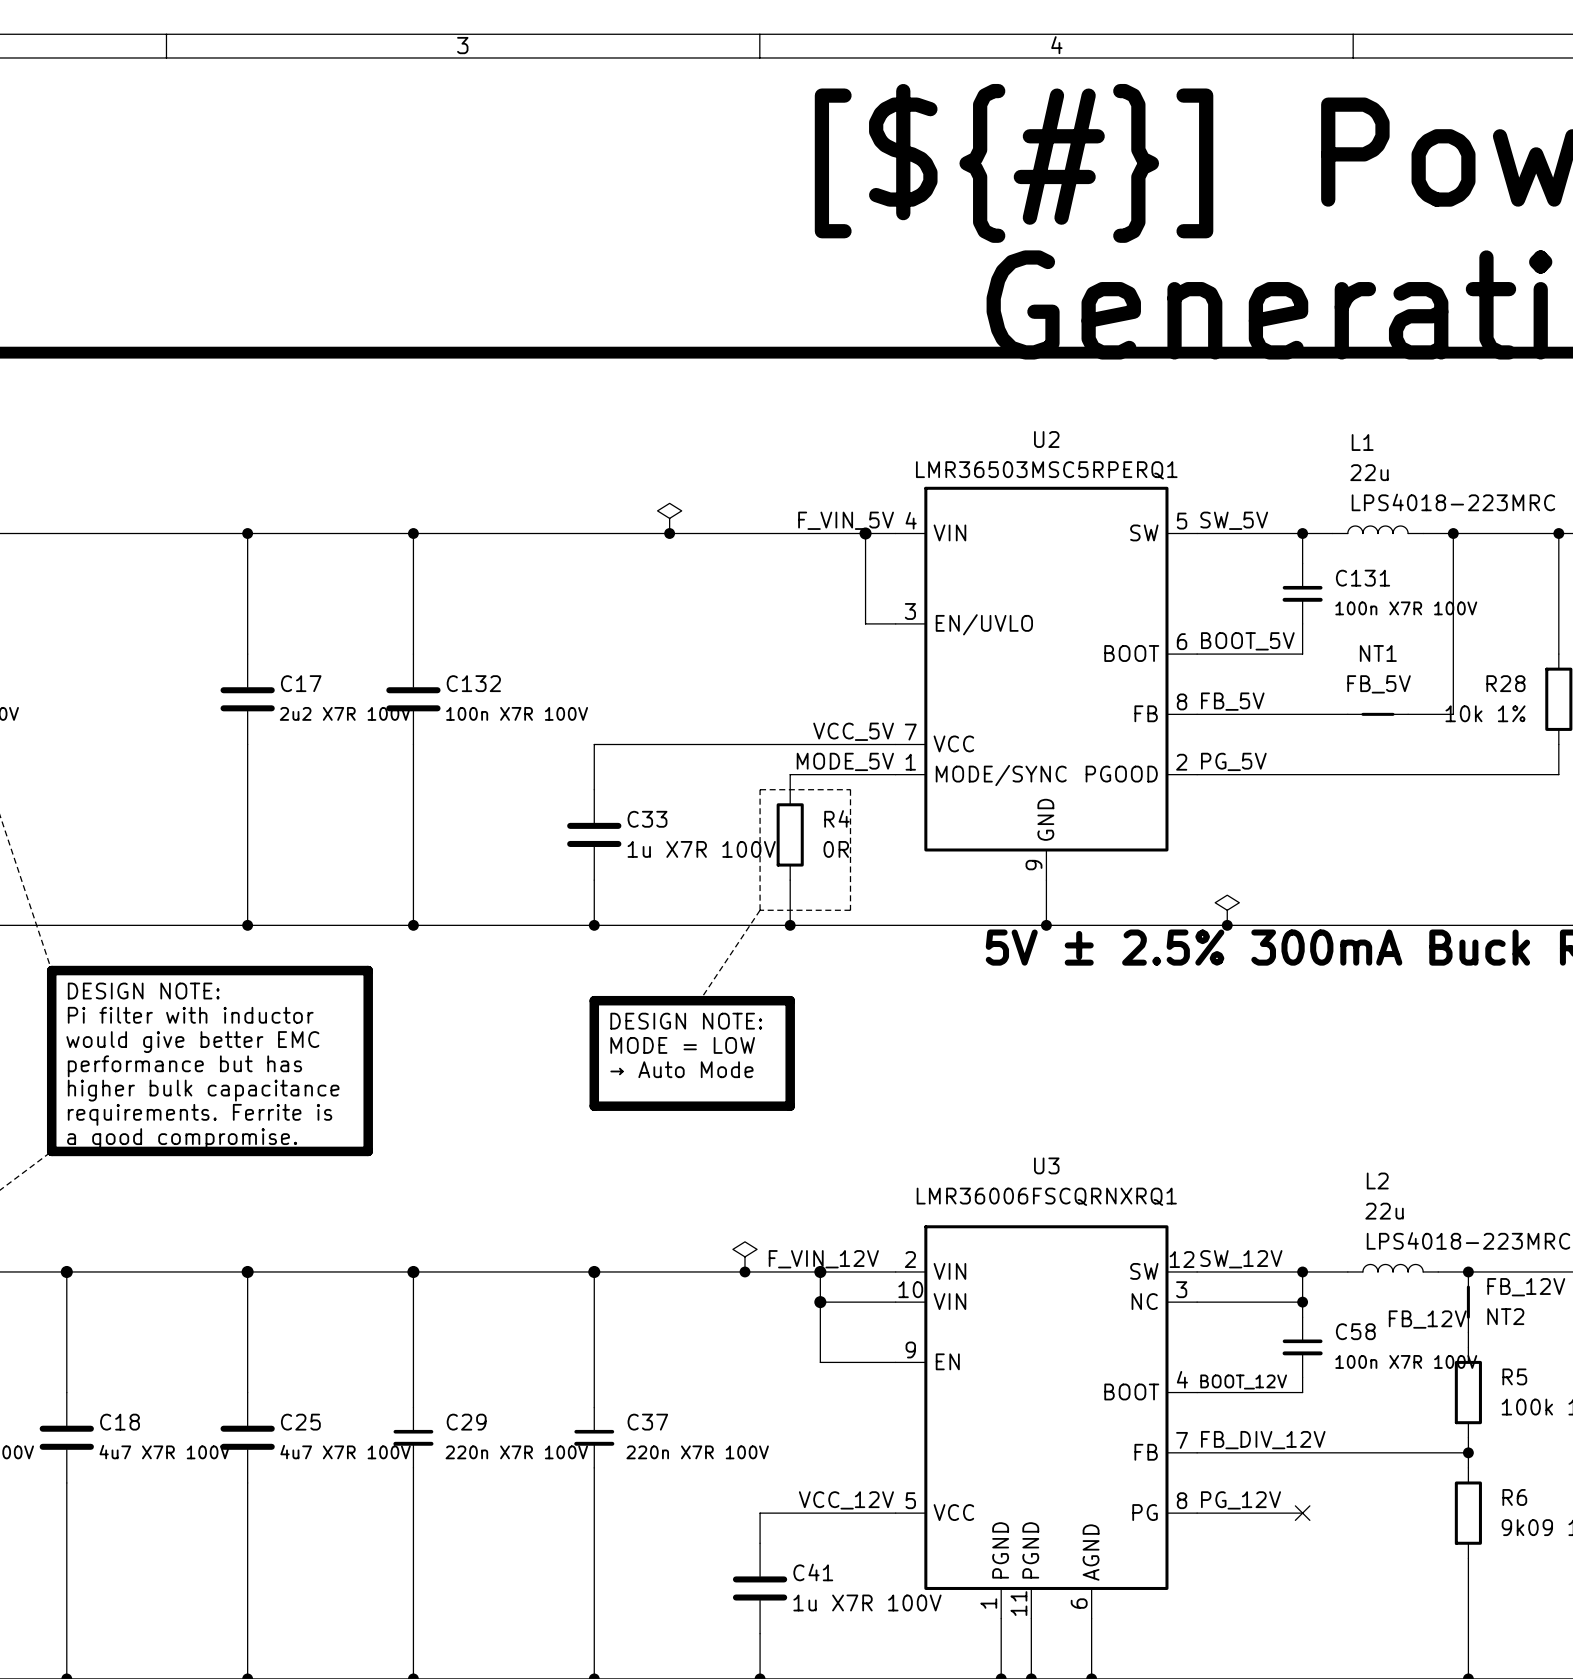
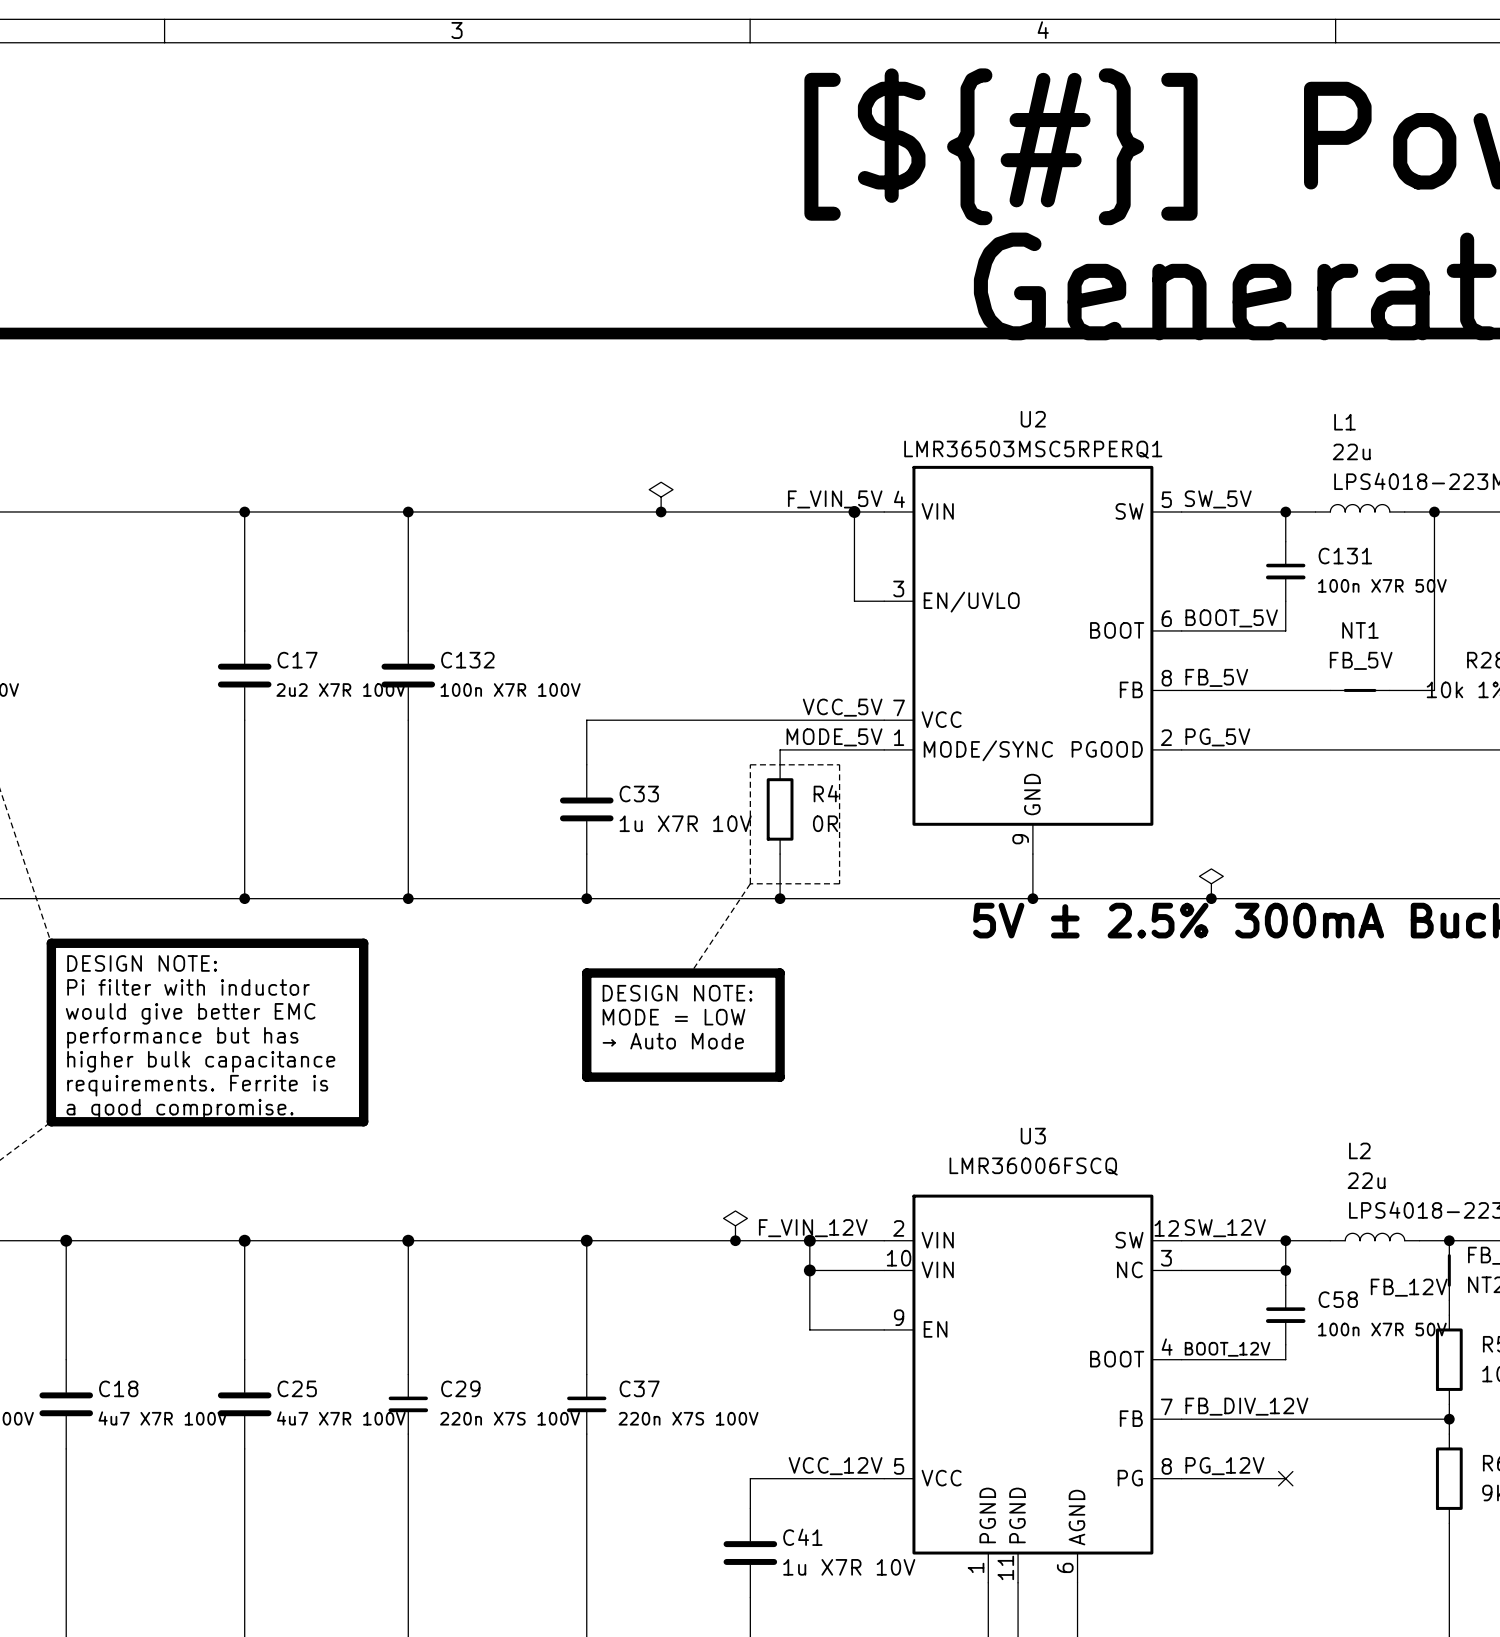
C131 value: 100n X7R 100V (1406, 608) -> 100n X7R 50V (1382, 585)
C33 value: 1u X7R 100V (701, 849) -> 1u X7R 10V (685, 823)
U3 value: LMR36006FSCQRNXRQ1 (1046, 1196) -> LMR36006FSCQ (1033, 1166)
C58 value: 100n X7R 100V (1406, 1361) -> 100n X7R 50V (1382, 1329)
C29 value: 220n X7R 100V (516, 1452) -> 220n X7S 100V (510, 1418)
C37 value: 220n X7R 100V (697, 1452) -> 220n X7S 100V (688, 1418)
C41 value: 1u X7R 100V (867, 1602) -> 1u X7R 10V (849, 1567)

